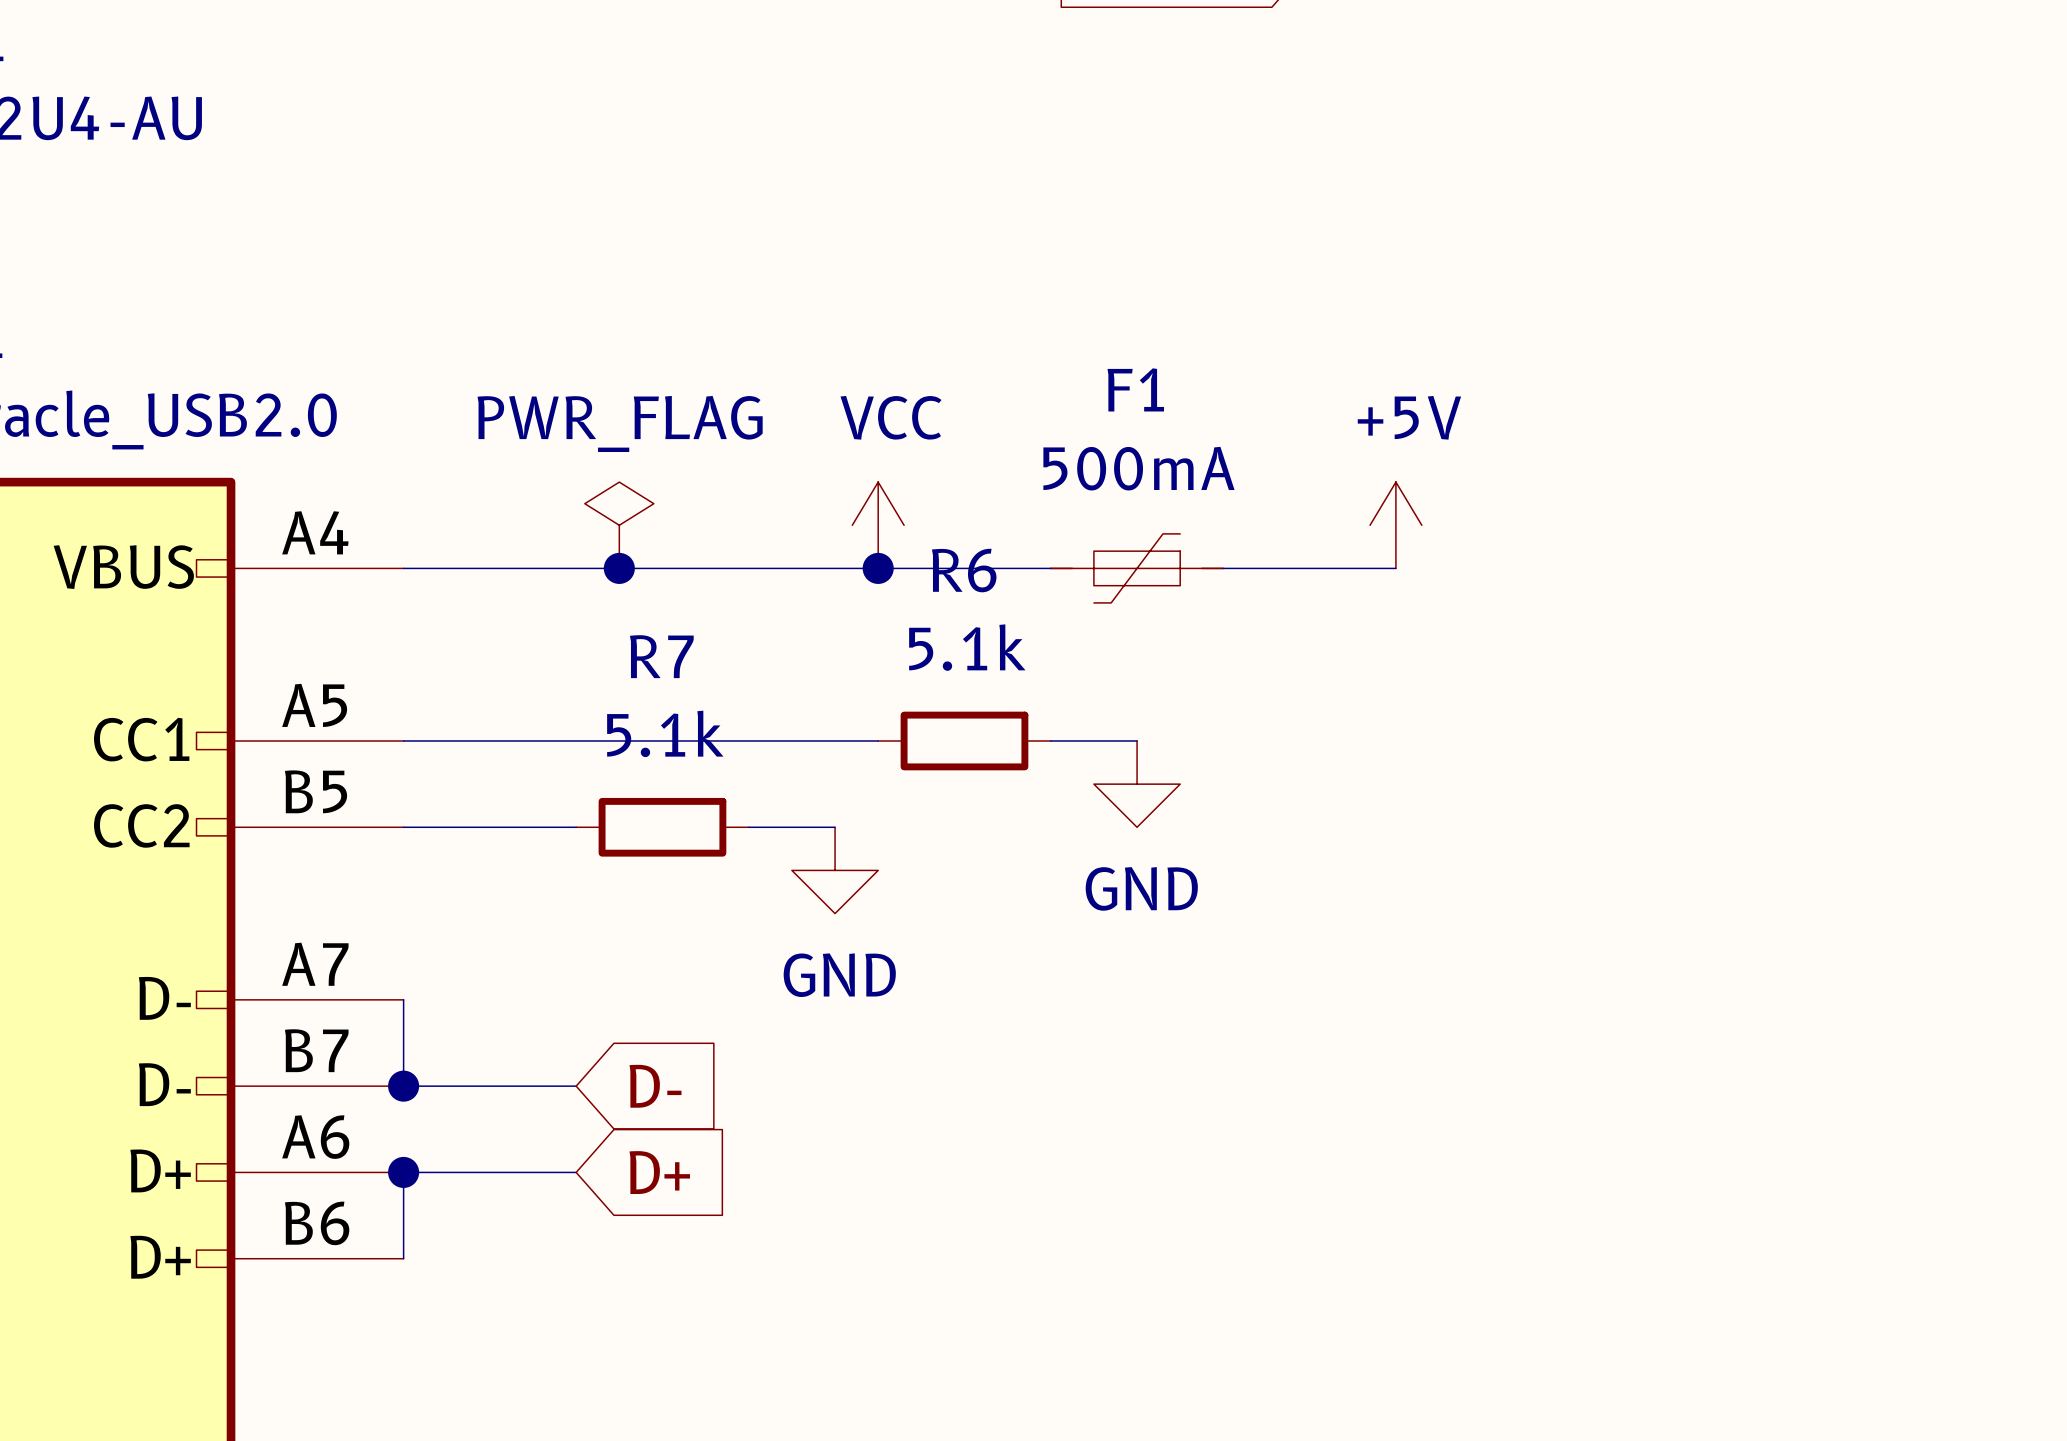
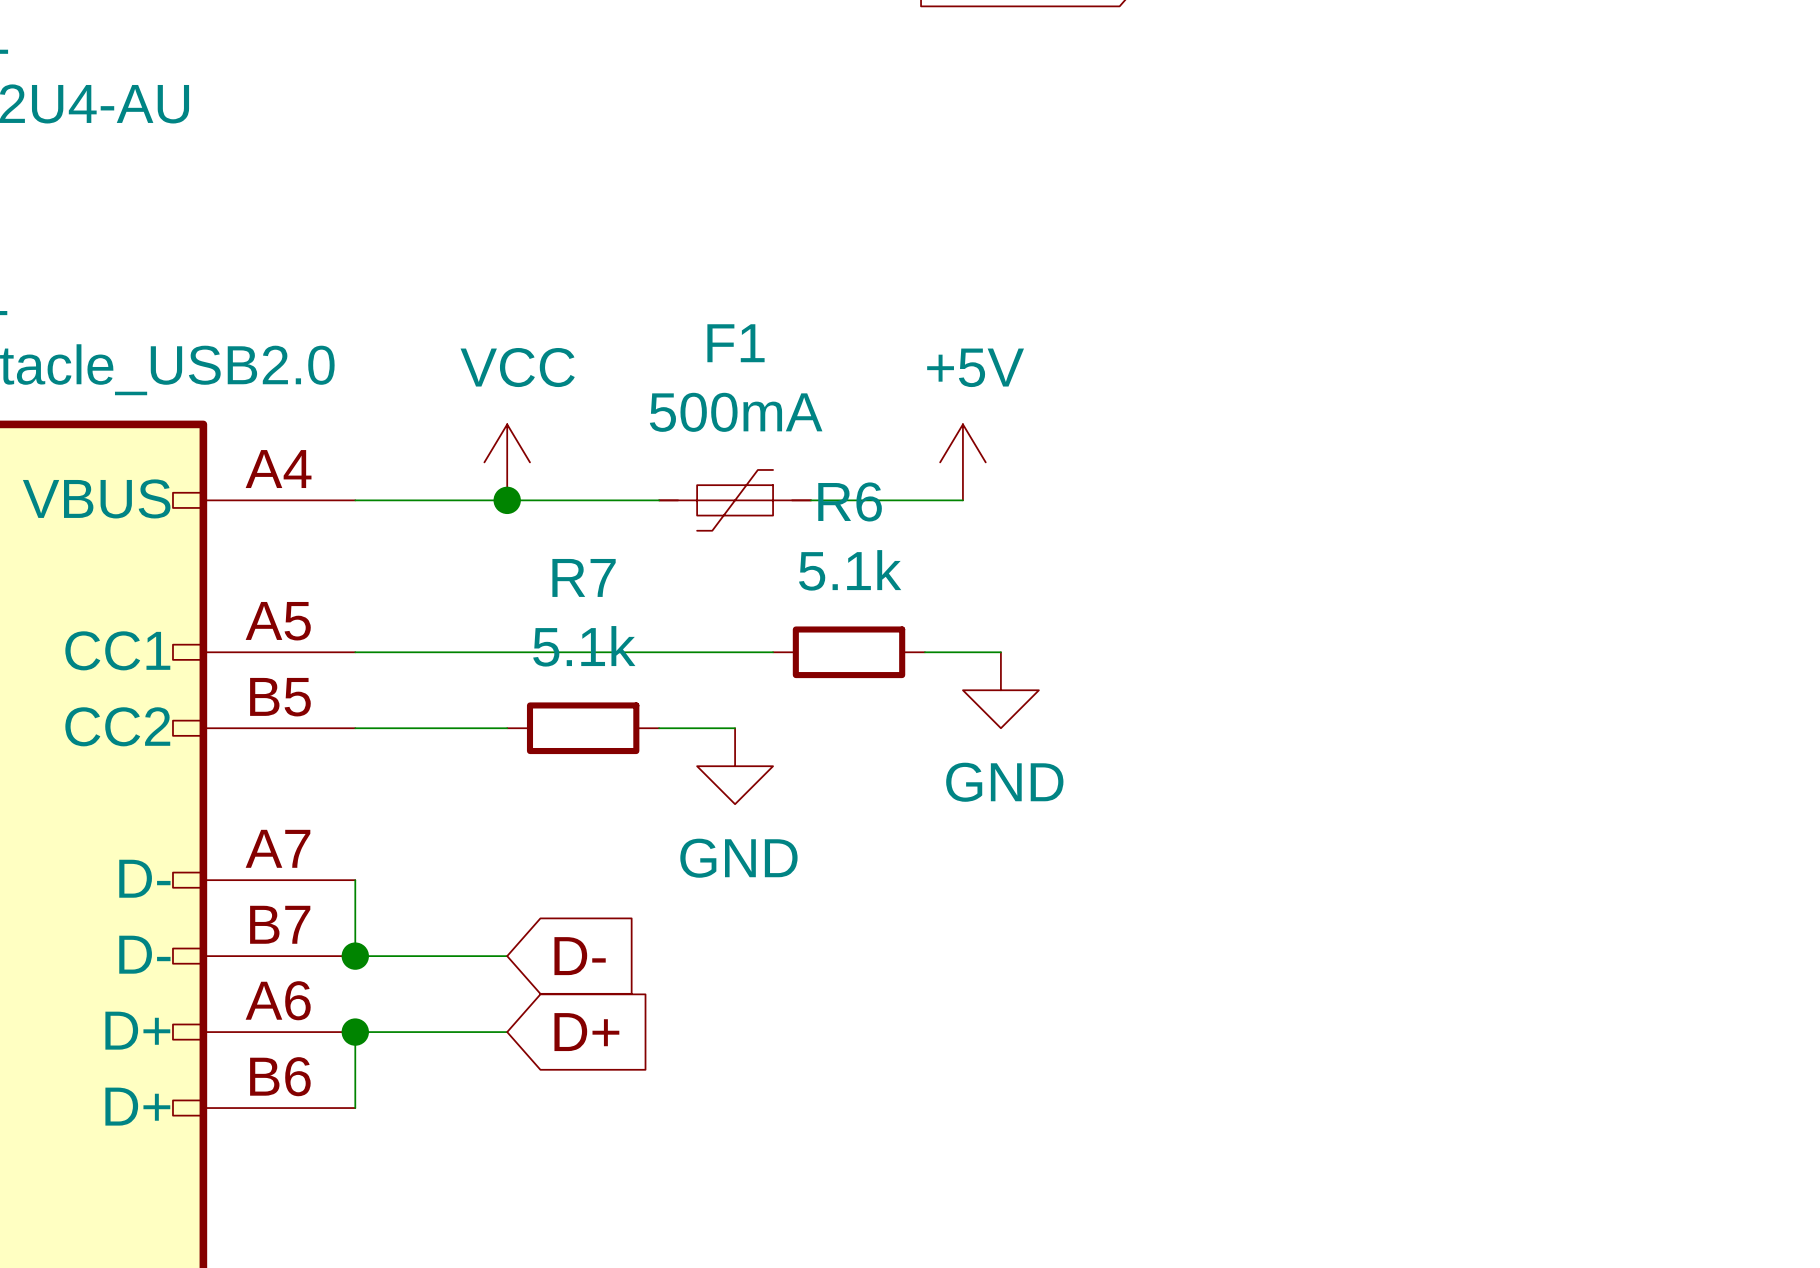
power symbol: PWR_FLAG (619, 525) -> none
power symbol position: VCC (878, 525) -> VCC (507, 462)
power symbol position: +5V (1395, 525) -> +5V (962, 462)
junction position: (619, 568) -> (507, 500)
junction: (878, 568) -> none
F1 position: (1137, 568) -> (735, 500)
wire: (1223, 568) (1395, 568) -> none

